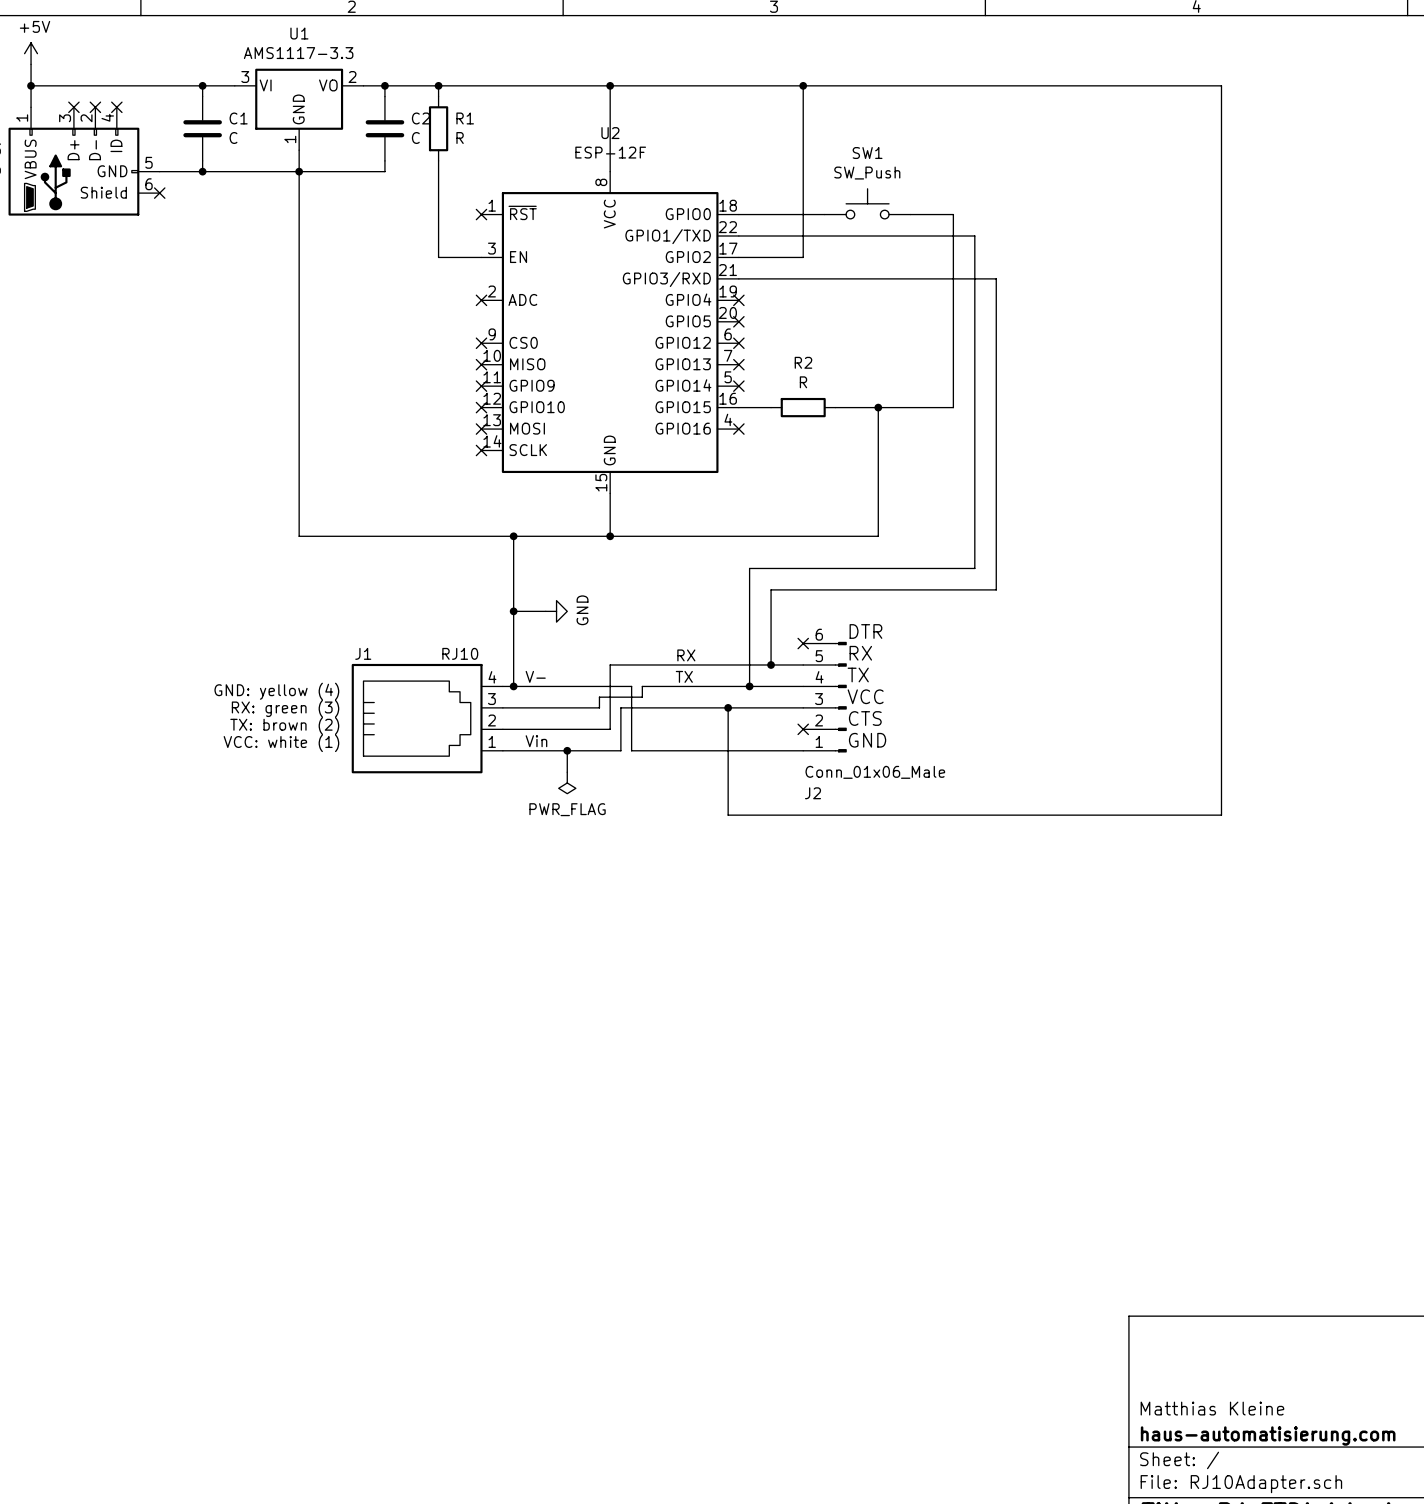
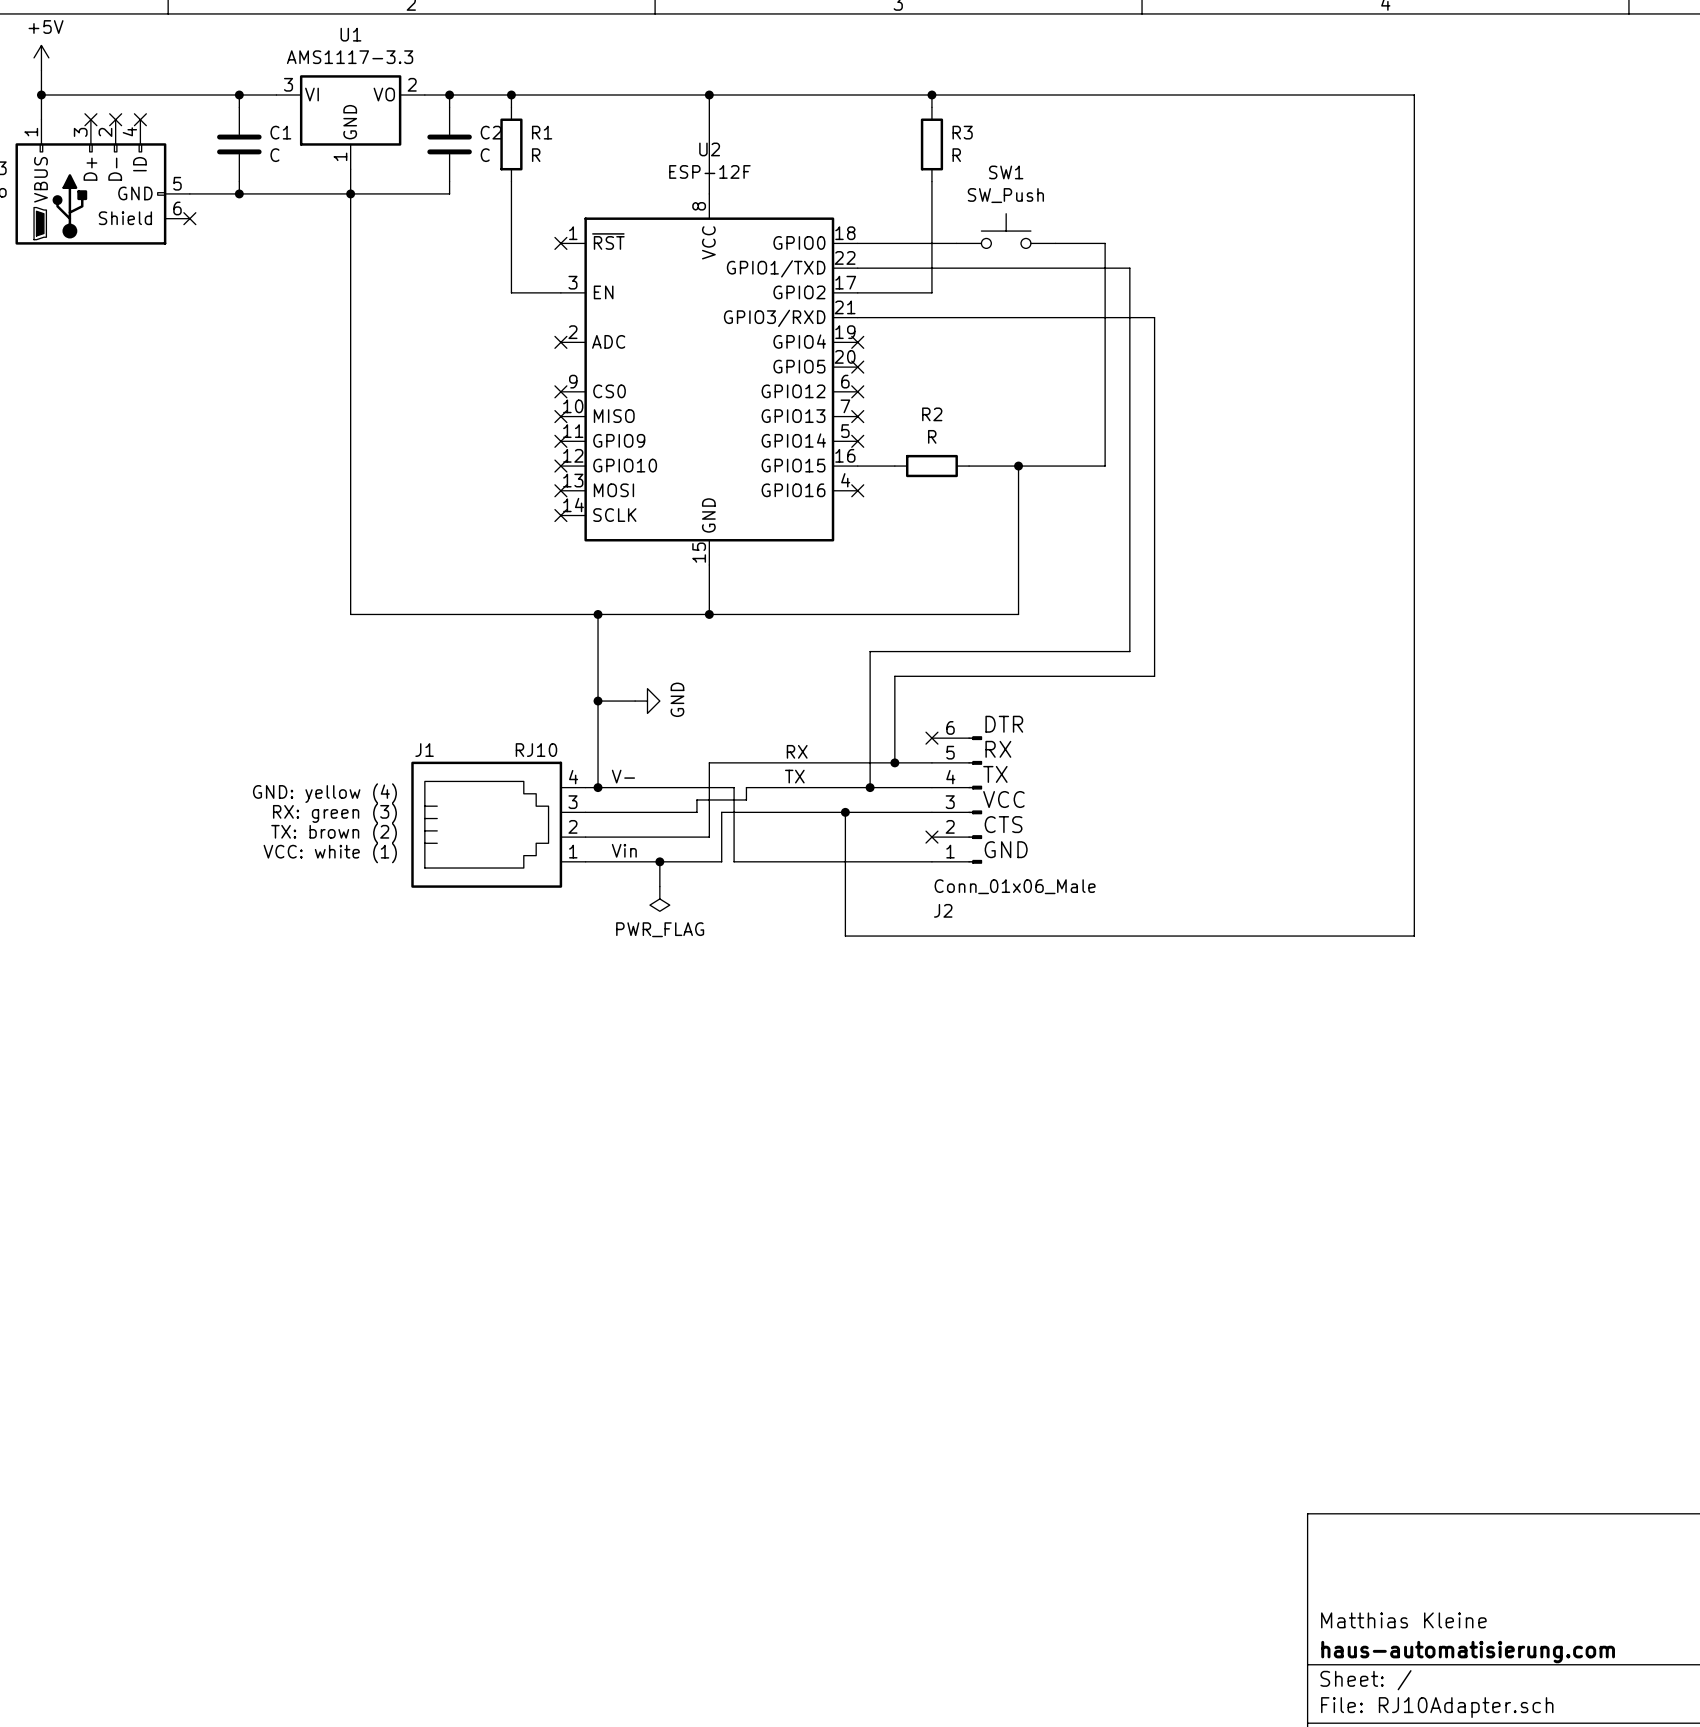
wire: (803, 96) (803, 160) -> none
R3: none -> R (931, 144)

